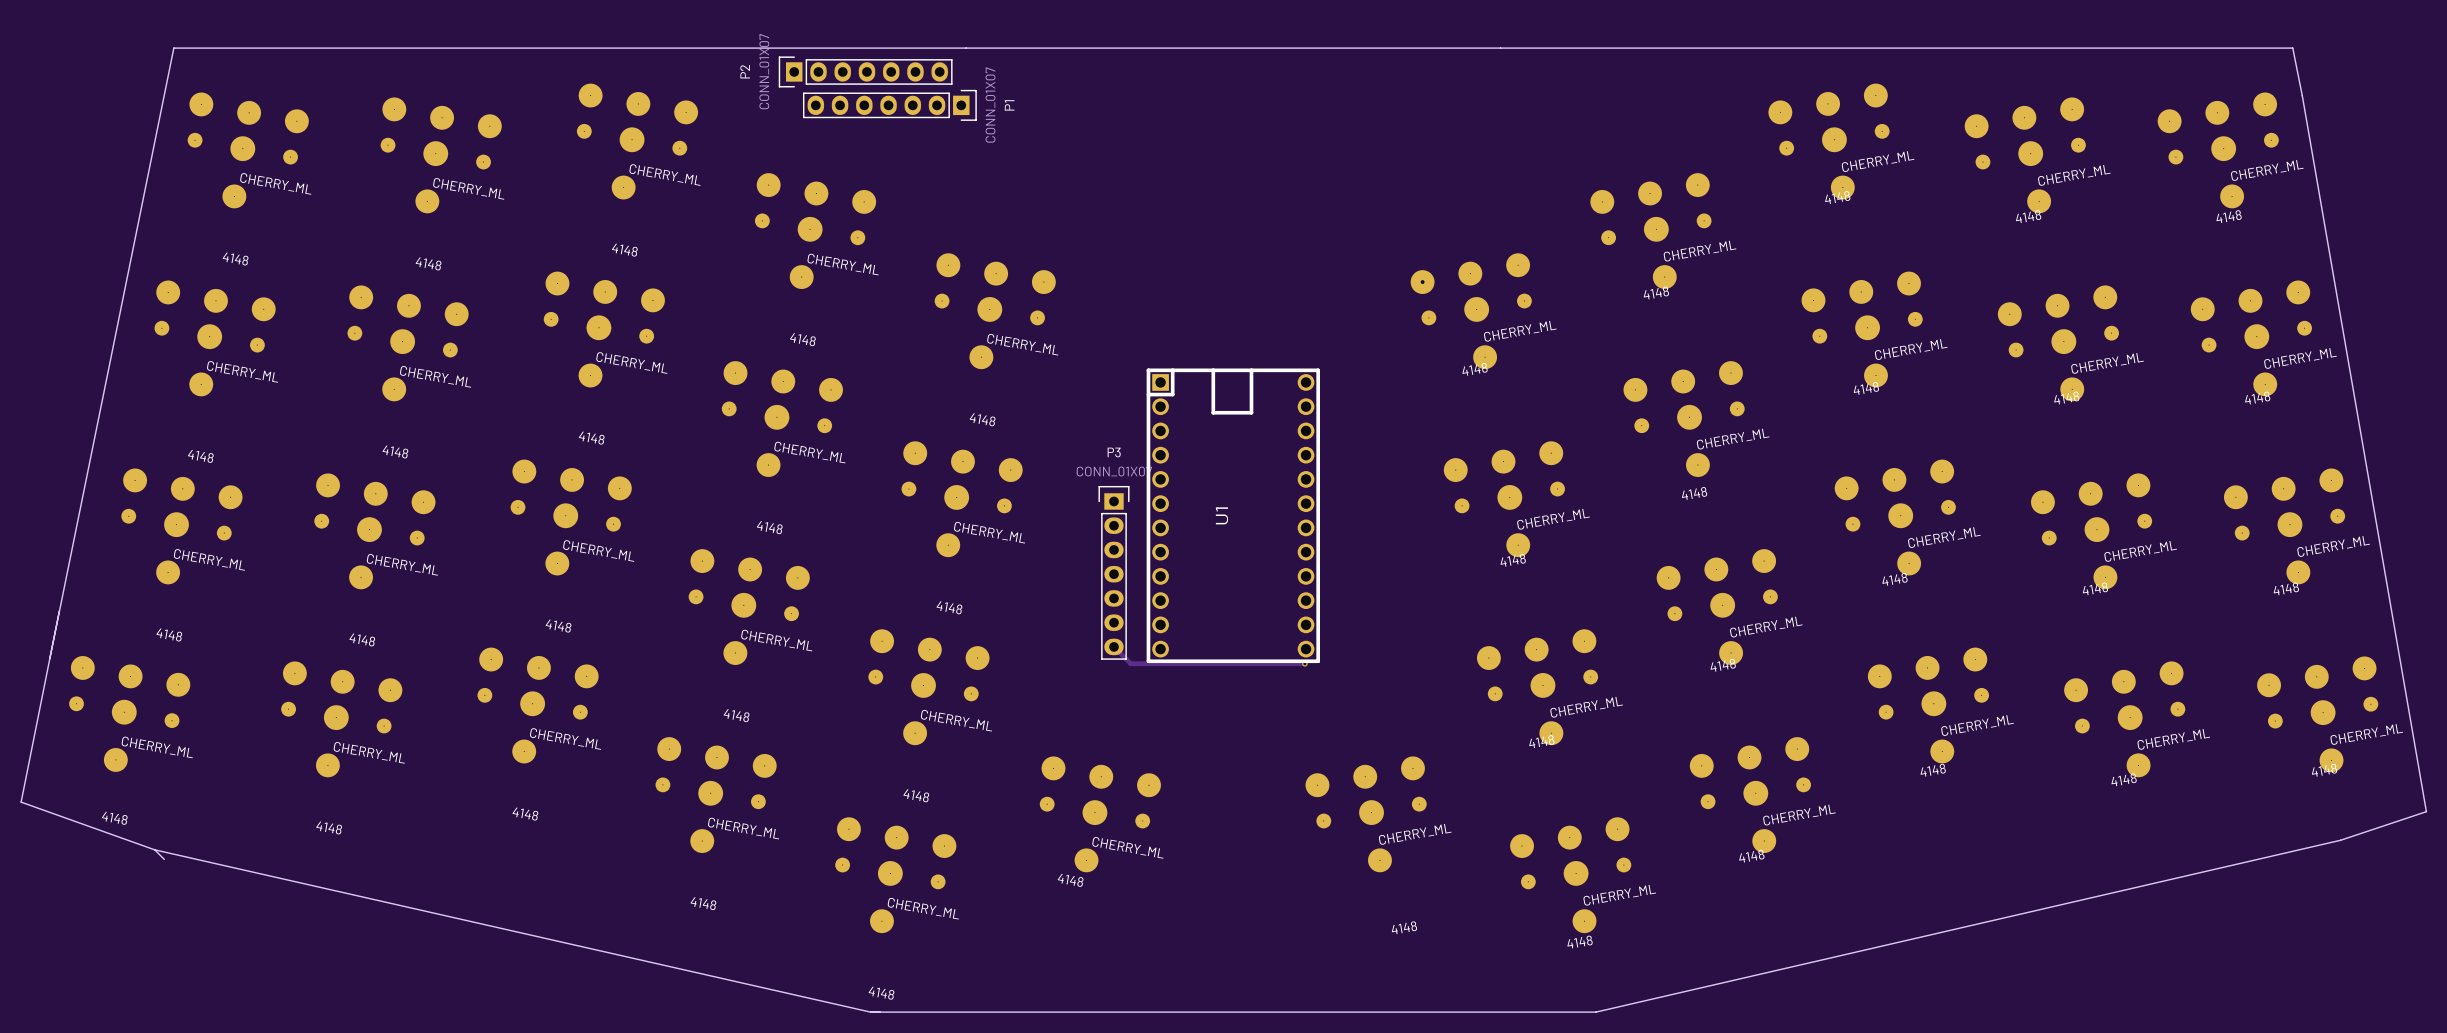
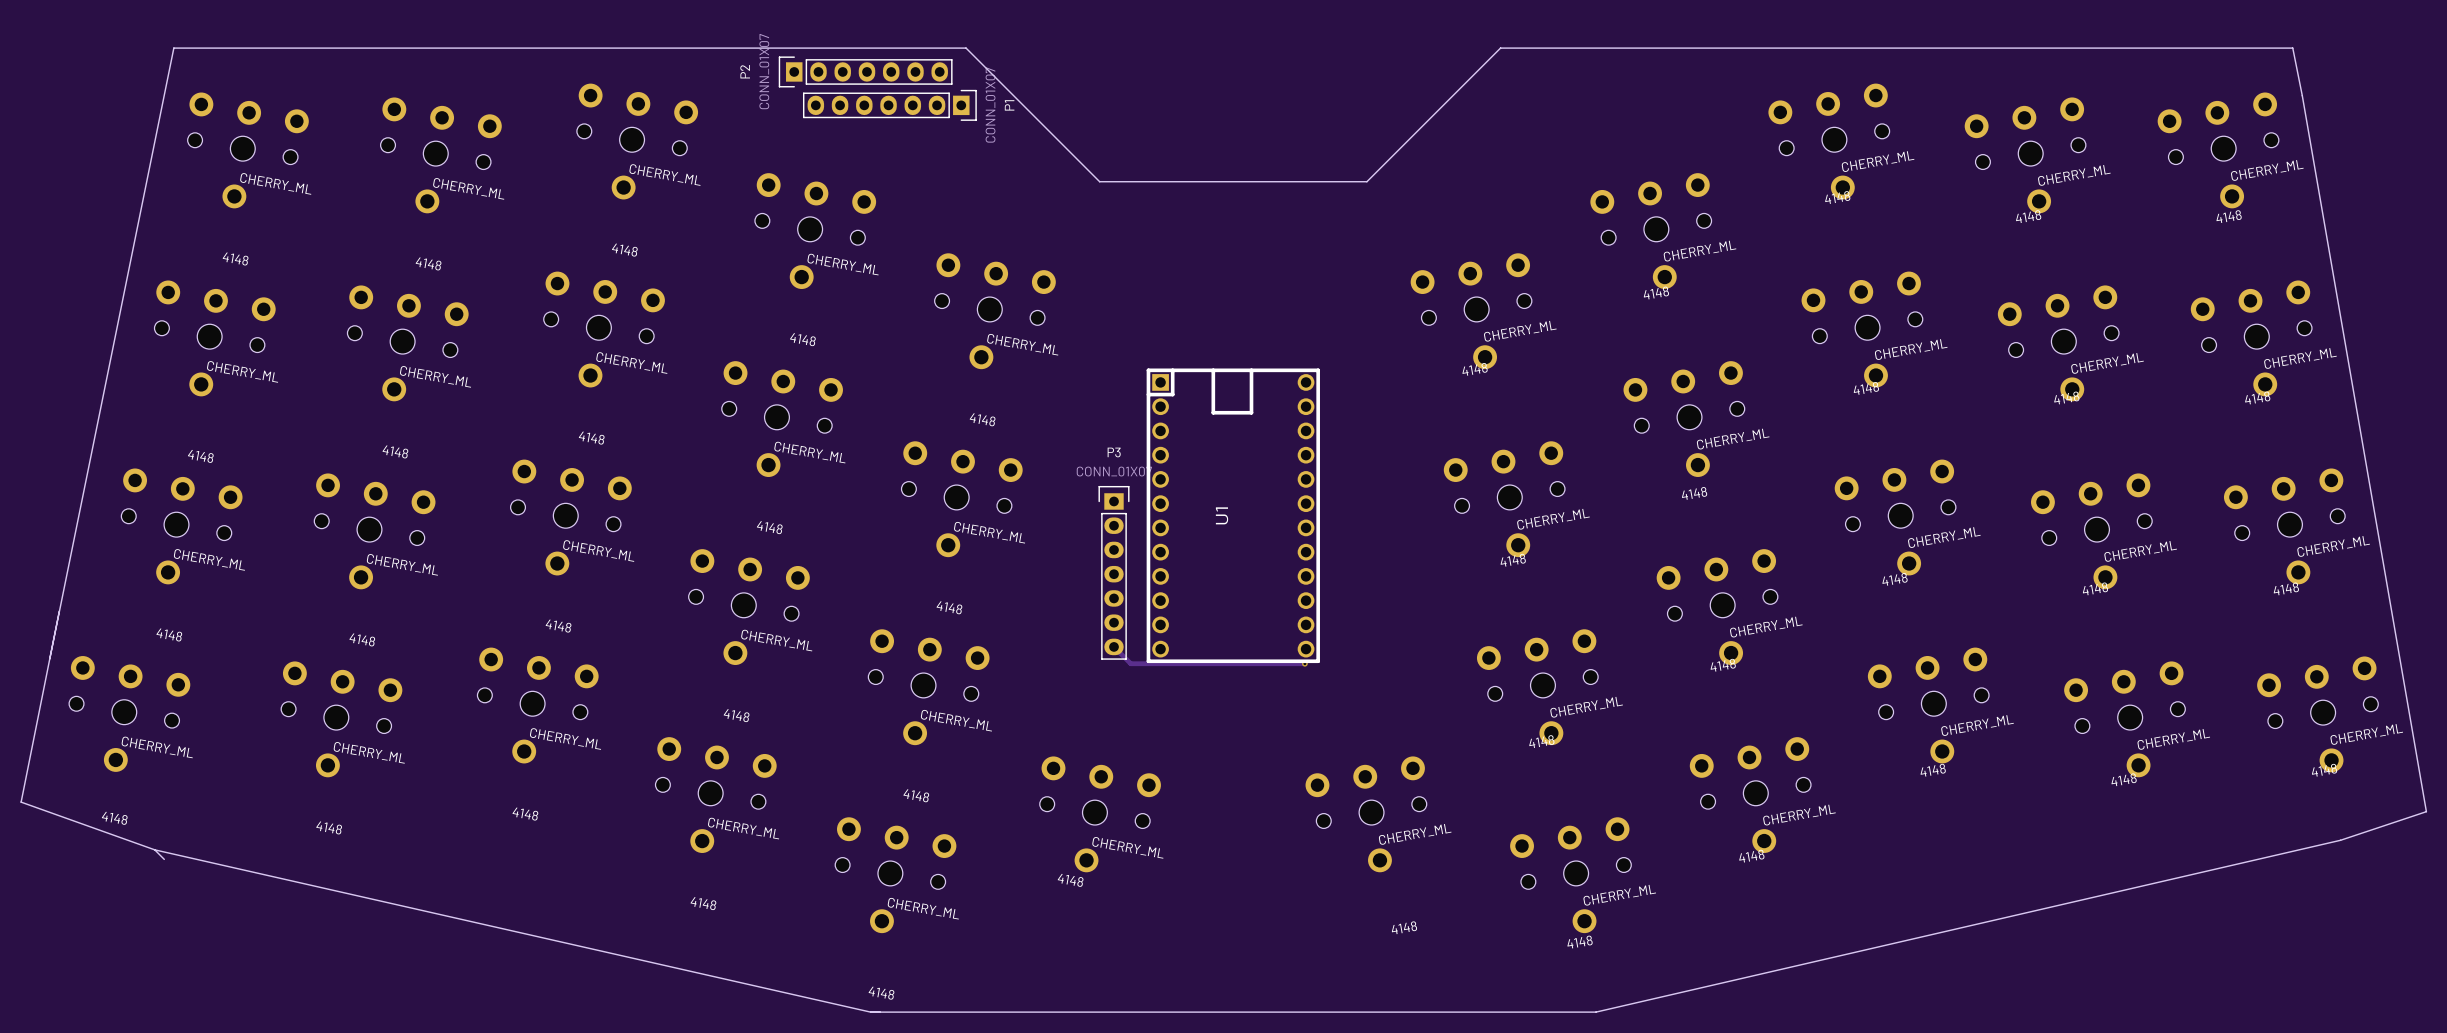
board edge: (966, 48) (1500, 48) -> (966, 48) (1099, 181) (1366, 181) (1500, 48)
part footprint: [576, 83, 699, 200] -> [576, 83, 699, 200]
part footprint: [1768, 83, 1890, 200] -> [1768, 83, 1890, 200]
part footprint: [187, 92, 309, 209] -> [187, 92, 309, 209]
part footprint: [2157, 92, 2279, 209] -> [2157, 92, 2279, 209]
part footprint: [380, 97, 502, 214] -> [380, 97, 502, 214]
part footprint: [1964, 97, 2086, 214] -> [1964, 97, 2086, 214]
part footprint: [754, 173, 877, 290] -> [754, 173, 877, 290]
part footprint: [1590, 173, 1712, 289] -> [1590, 173, 1712, 289]
part footprint: [934, 253, 1056, 370] -> [934, 253, 1056, 370]
part footprint: [1410, 253, 1532, 370] -> [1410, 253, 1532, 370]
part footprint: [543, 271, 665, 388] -> [543, 271, 665, 388]
part footprint: [1801, 271, 1923, 388] -> [1801, 271, 1923, 388]
part footprint: [154, 280, 276, 397] -> [154, 280, 276, 397]
part footprint: [2190, 280, 2312, 397] -> [2190, 280, 2312, 397]
part footprint: [347, 285, 469, 402] -> [347, 285, 469, 402]
part footprint: [1997, 285, 2120, 402] -> [1997, 285, 2120, 402]
part footprint: [721, 361, 843, 477] -> [721, 361, 843, 477]
part footprint: [1623, 361, 1745, 477] -> [1623, 361, 1745, 477]
part footprint: [901, 441, 1023, 558] -> [901, 441, 1023, 558]
part footprint: [1443, 441, 1565, 558] -> [1443, 441, 1565, 558]
part footprint: [510, 459, 632, 576] -> [510, 459, 632, 576]
part footprint: [1834, 459, 1956, 576] -> [1834, 459, 1956, 576]
part footprint: [121, 468, 243, 585] -> [121, 468, 243, 585]
part footprint: [2223, 468, 2346, 585] -> [2223, 468, 2346, 585]
part footprint: [314, 473, 436, 590] -> [314, 473, 436, 590]
part footprint: [2031, 473, 2153, 590] -> [2031, 473, 2153, 590]
part footprint: [688, 549, 810, 665] -> [688, 549, 810, 665]
part footprint: [1656, 549, 1778, 665] -> [1656, 549, 1778, 665]
part footprint: [868, 629, 990, 746] -> [868, 629, 990, 746]
part footprint: [1476, 629, 1599, 746] -> [1476, 629, 1599, 746]
part footprint: [477, 647, 599, 764] -> [477, 647, 599, 764]
part footprint: [1867, 647, 1990, 764] -> [1867, 647, 1990, 764]
part footprint: [69, 656, 191, 772] -> [69, 656, 191, 772]
part footprint: [2257, 656, 2379, 773] -> [2257, 656, 2379, 773]
part footprint: [281, 661, 403, 778] -> [281, 661, 403, 778]
part footprint: [2064, 661, 2186, 778] -> [2064, 661, 2186, 778]
part footprint: [655, 737, 777, 853] -> [655, 737, 777, 853]
part footprint: [1689, 737, 1811, 853] -> [1689, 737, 1811, 853]
part footprint: [1039, 756, 1161, 873] -> [1039, 756, 1161, 873]
part footprint: [1305, 756, 1427, 873] -> [1305, 756, 1427, 873]
part footprint: [835, 817, 957, 934] -> [835, 817, 957, 934]
part footprint: [1510, 817, 1632, 934] -> [1510, 817, 1632, 934]

